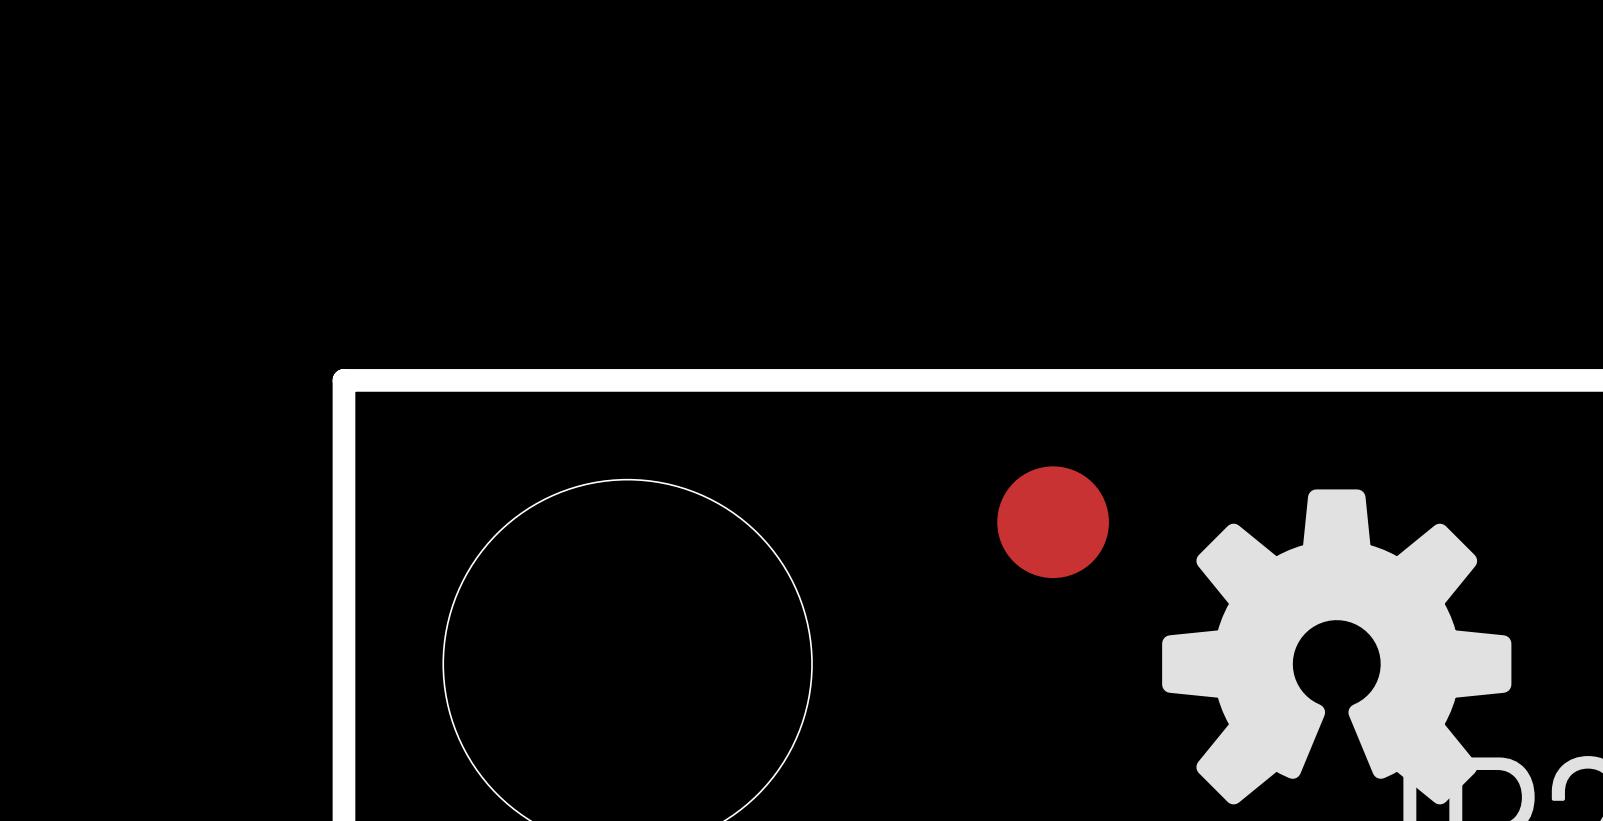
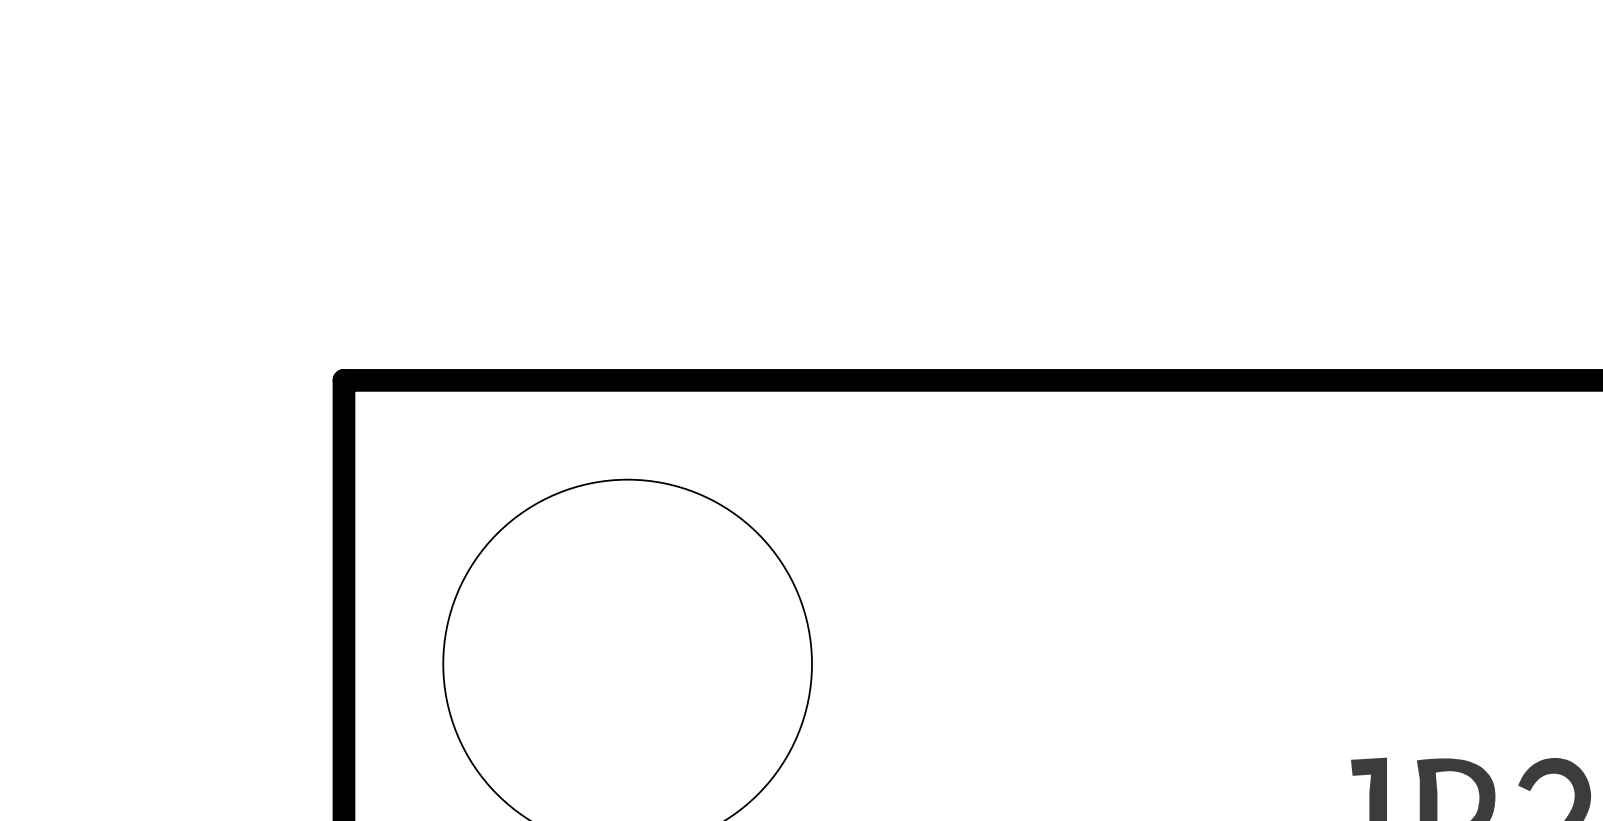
drawing: [1162, 489, 1512, 805] -> none
part: (1053, 522) -> none

